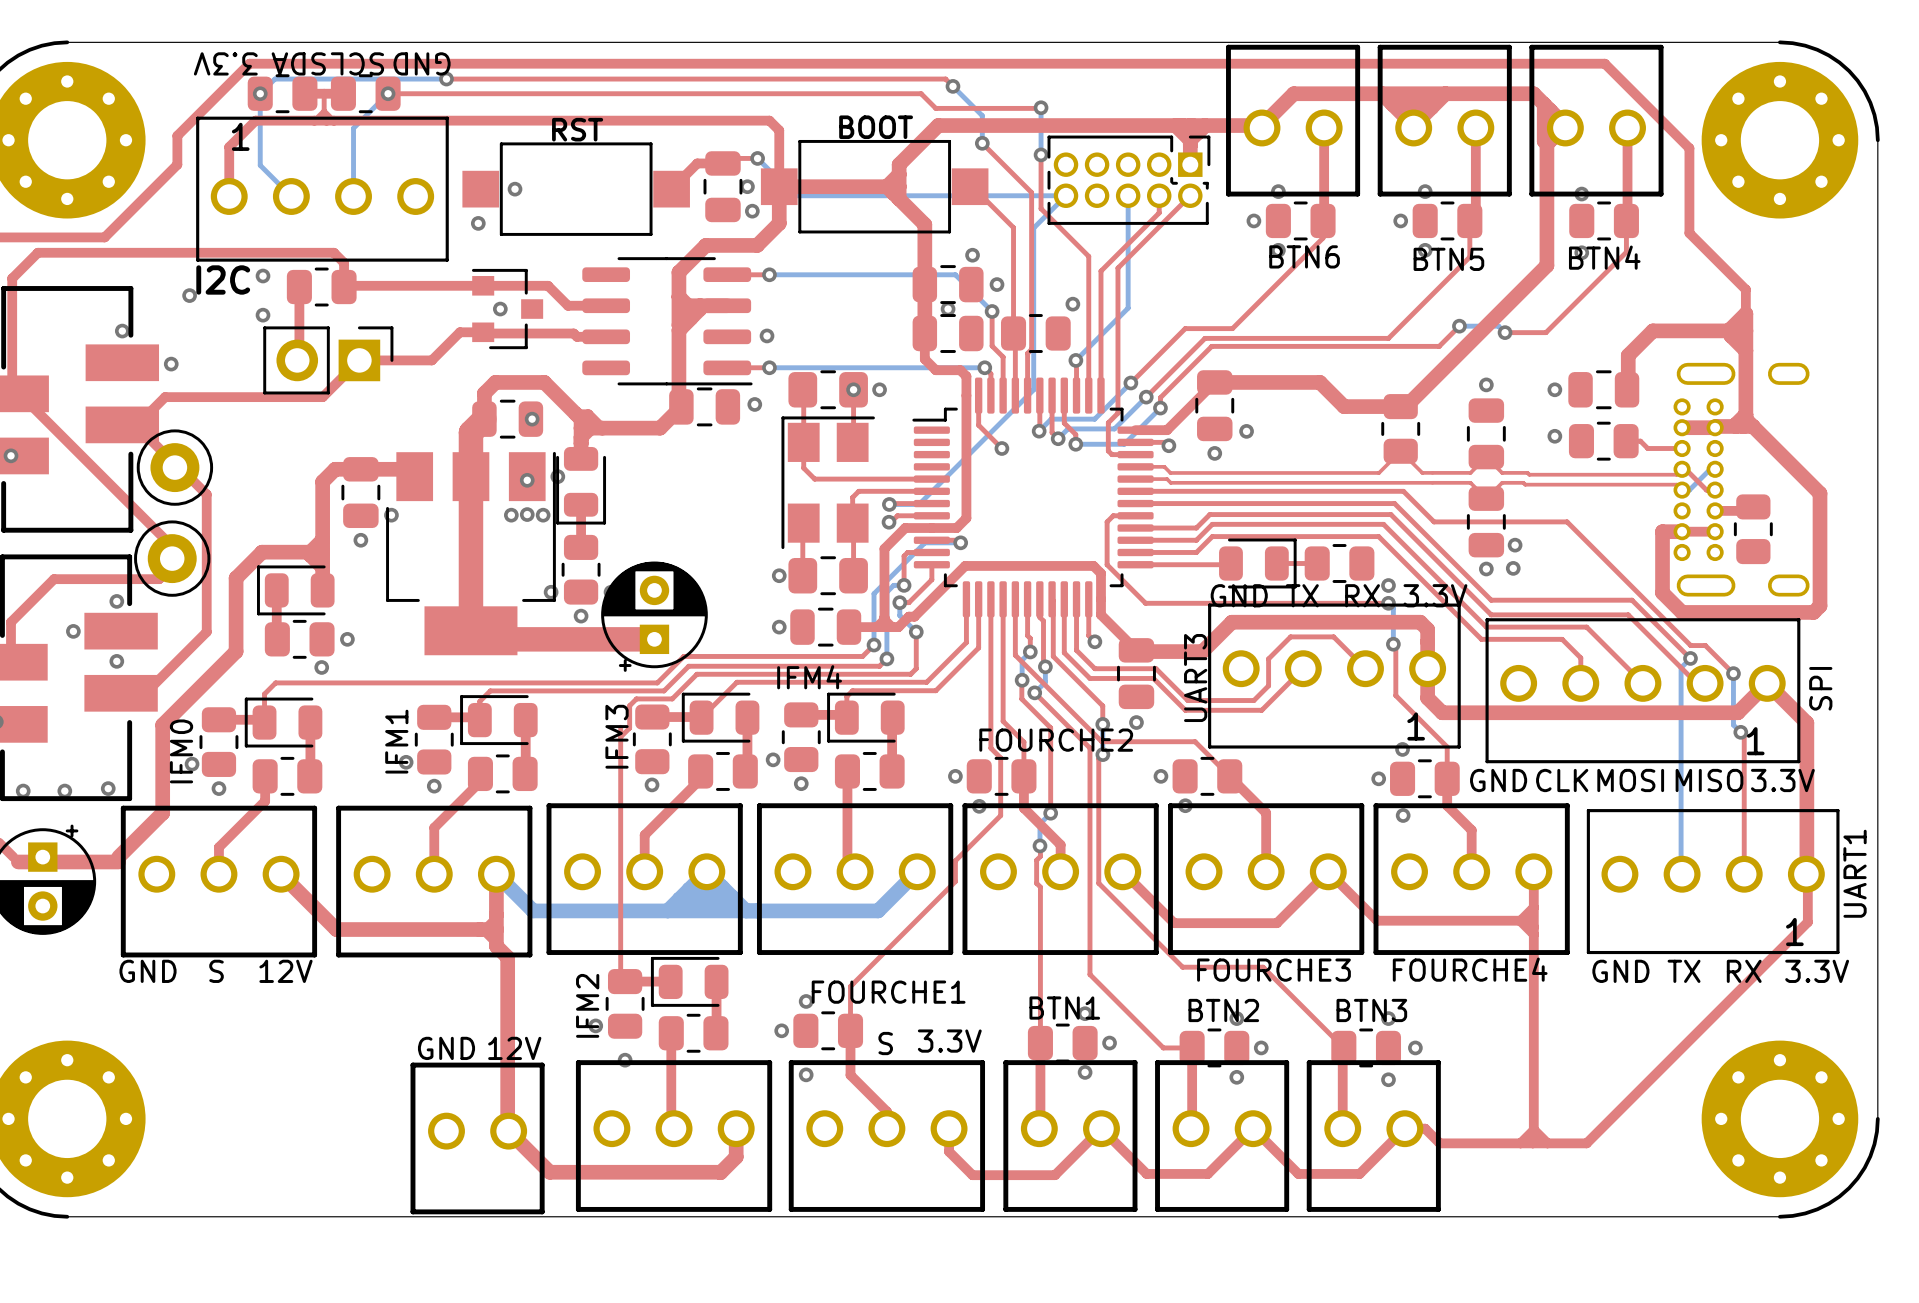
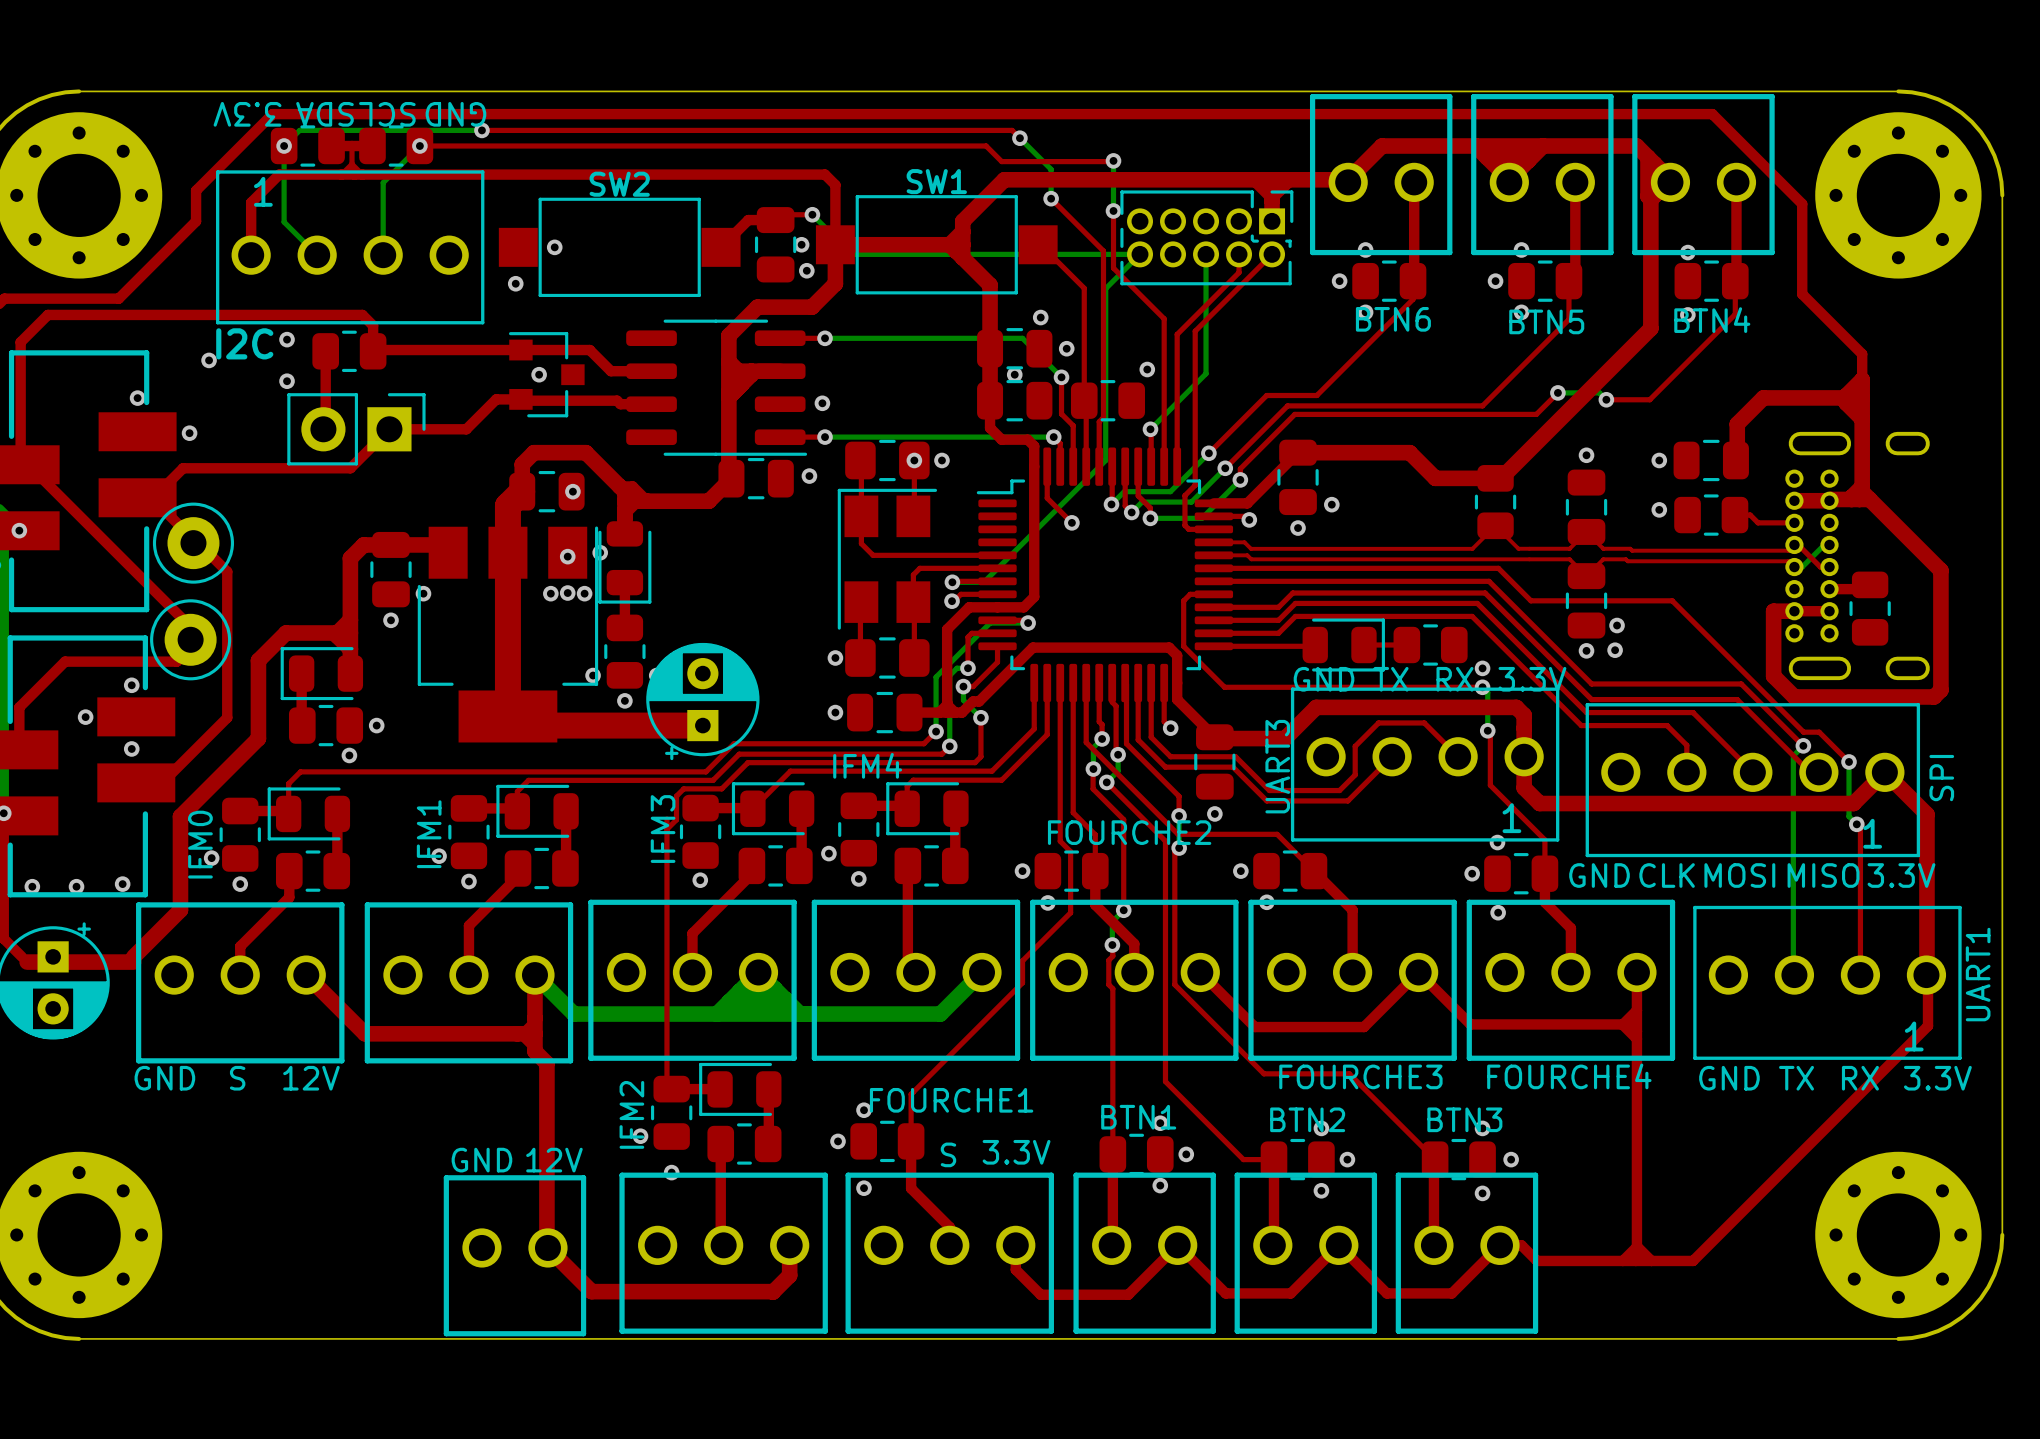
BOOT name: BOOT (876, 127) -> SW1 (936, 181)
RST name: RST (577, 129) -> SW2 (619, 184)

